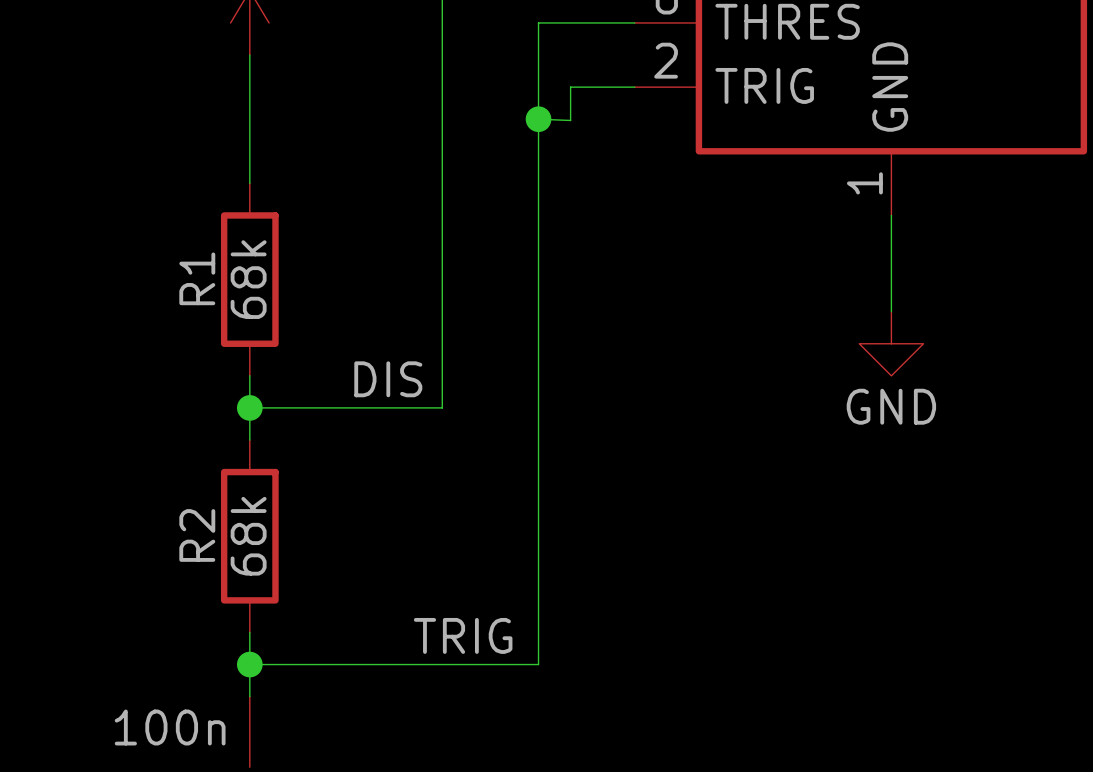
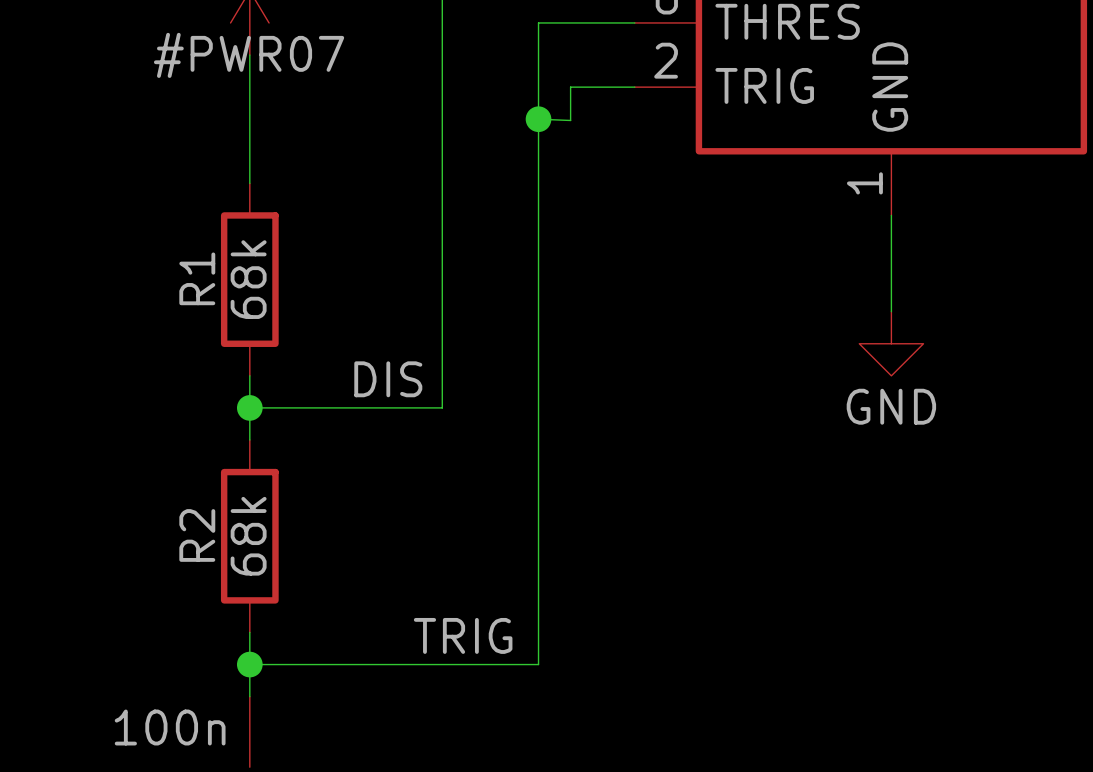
#PWR07 name: none -> #PWR07 (249, 55)

